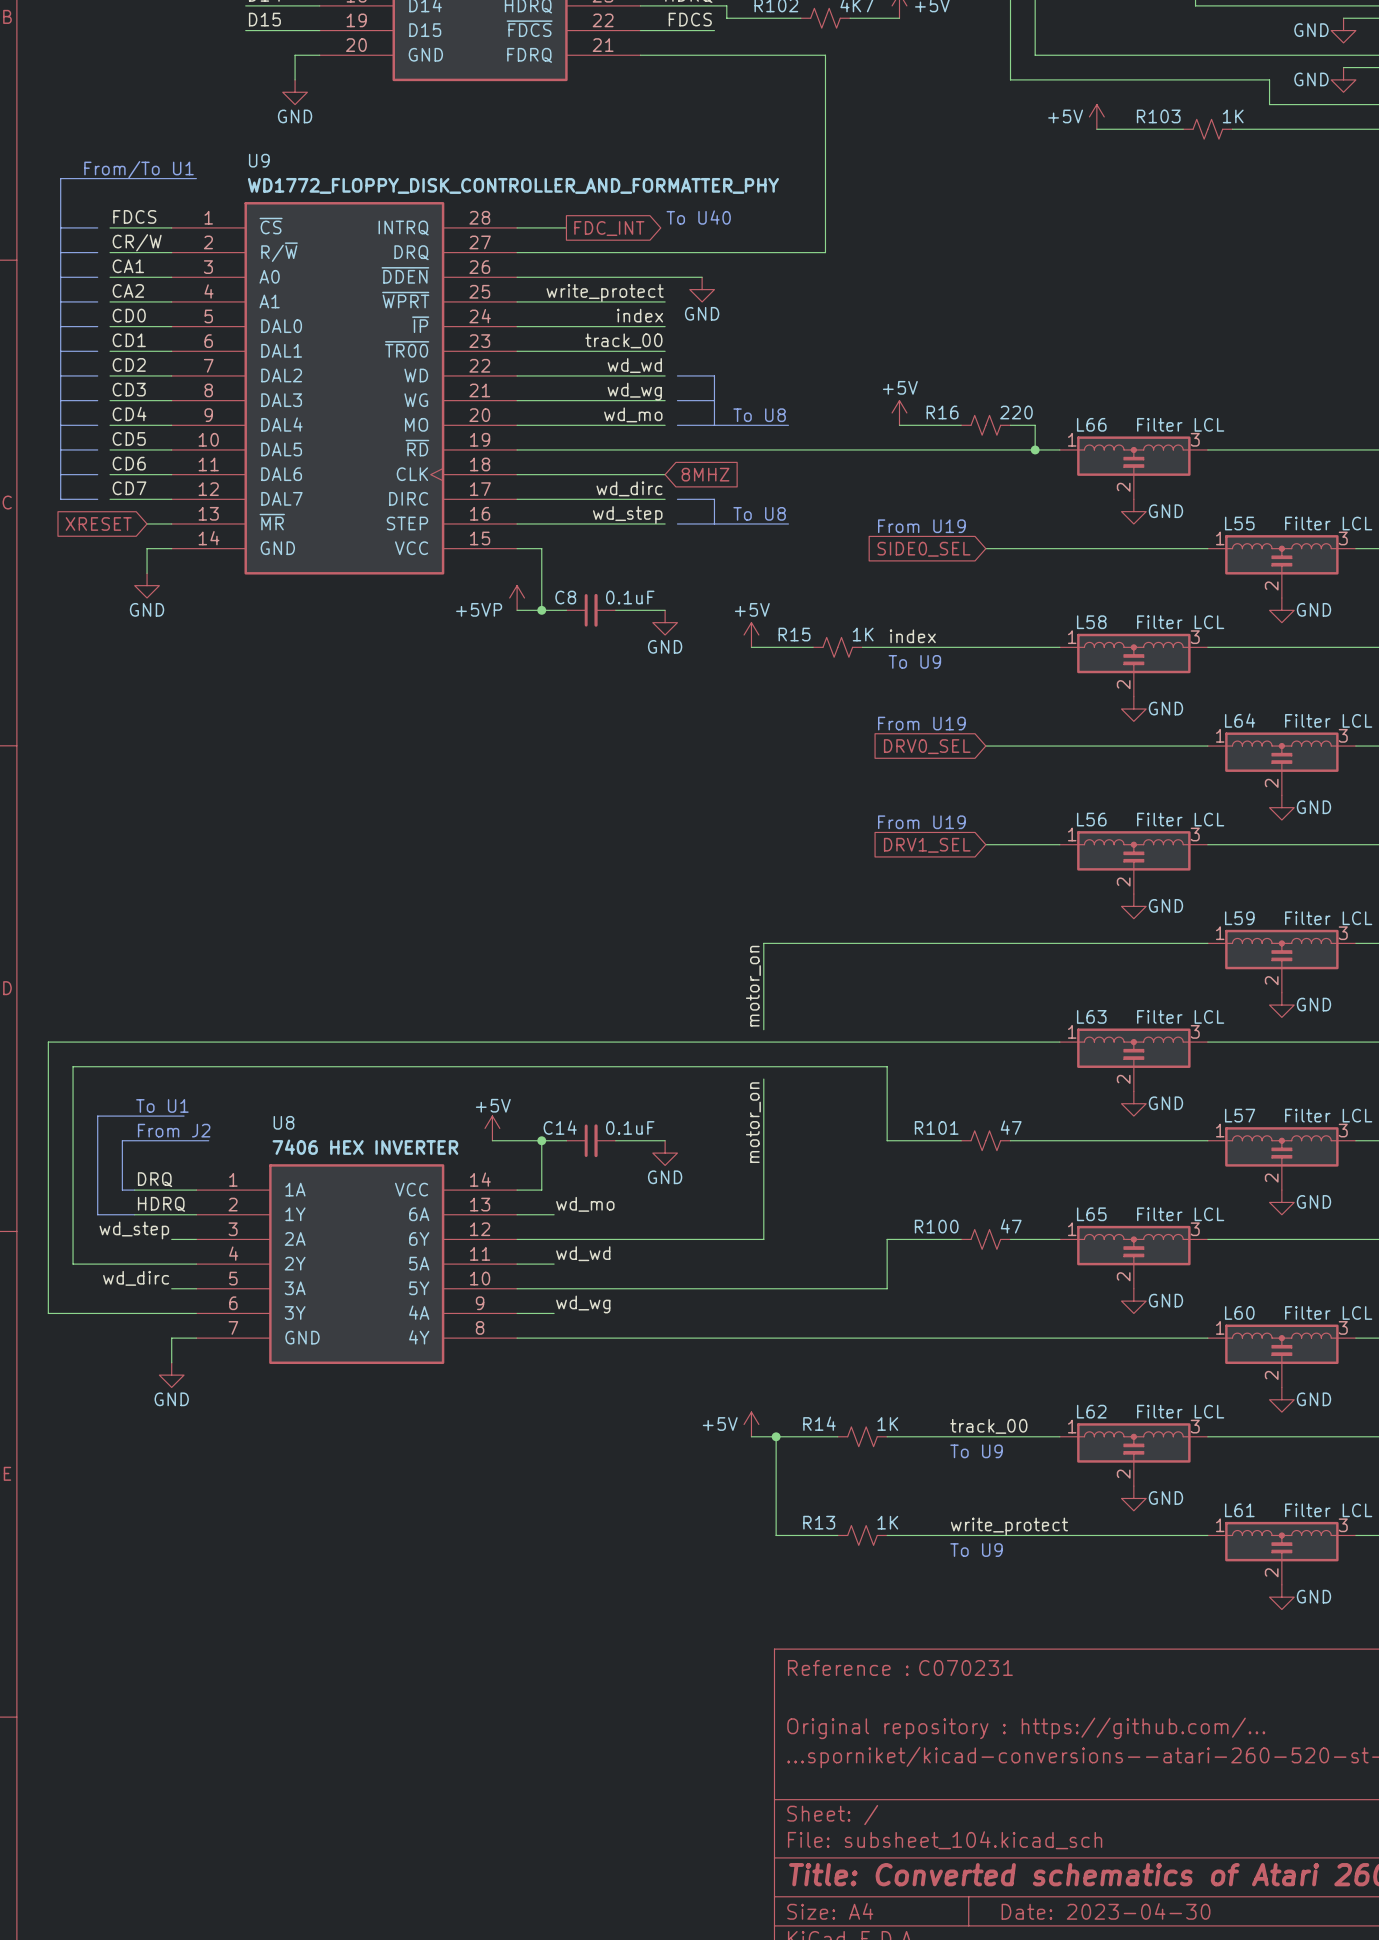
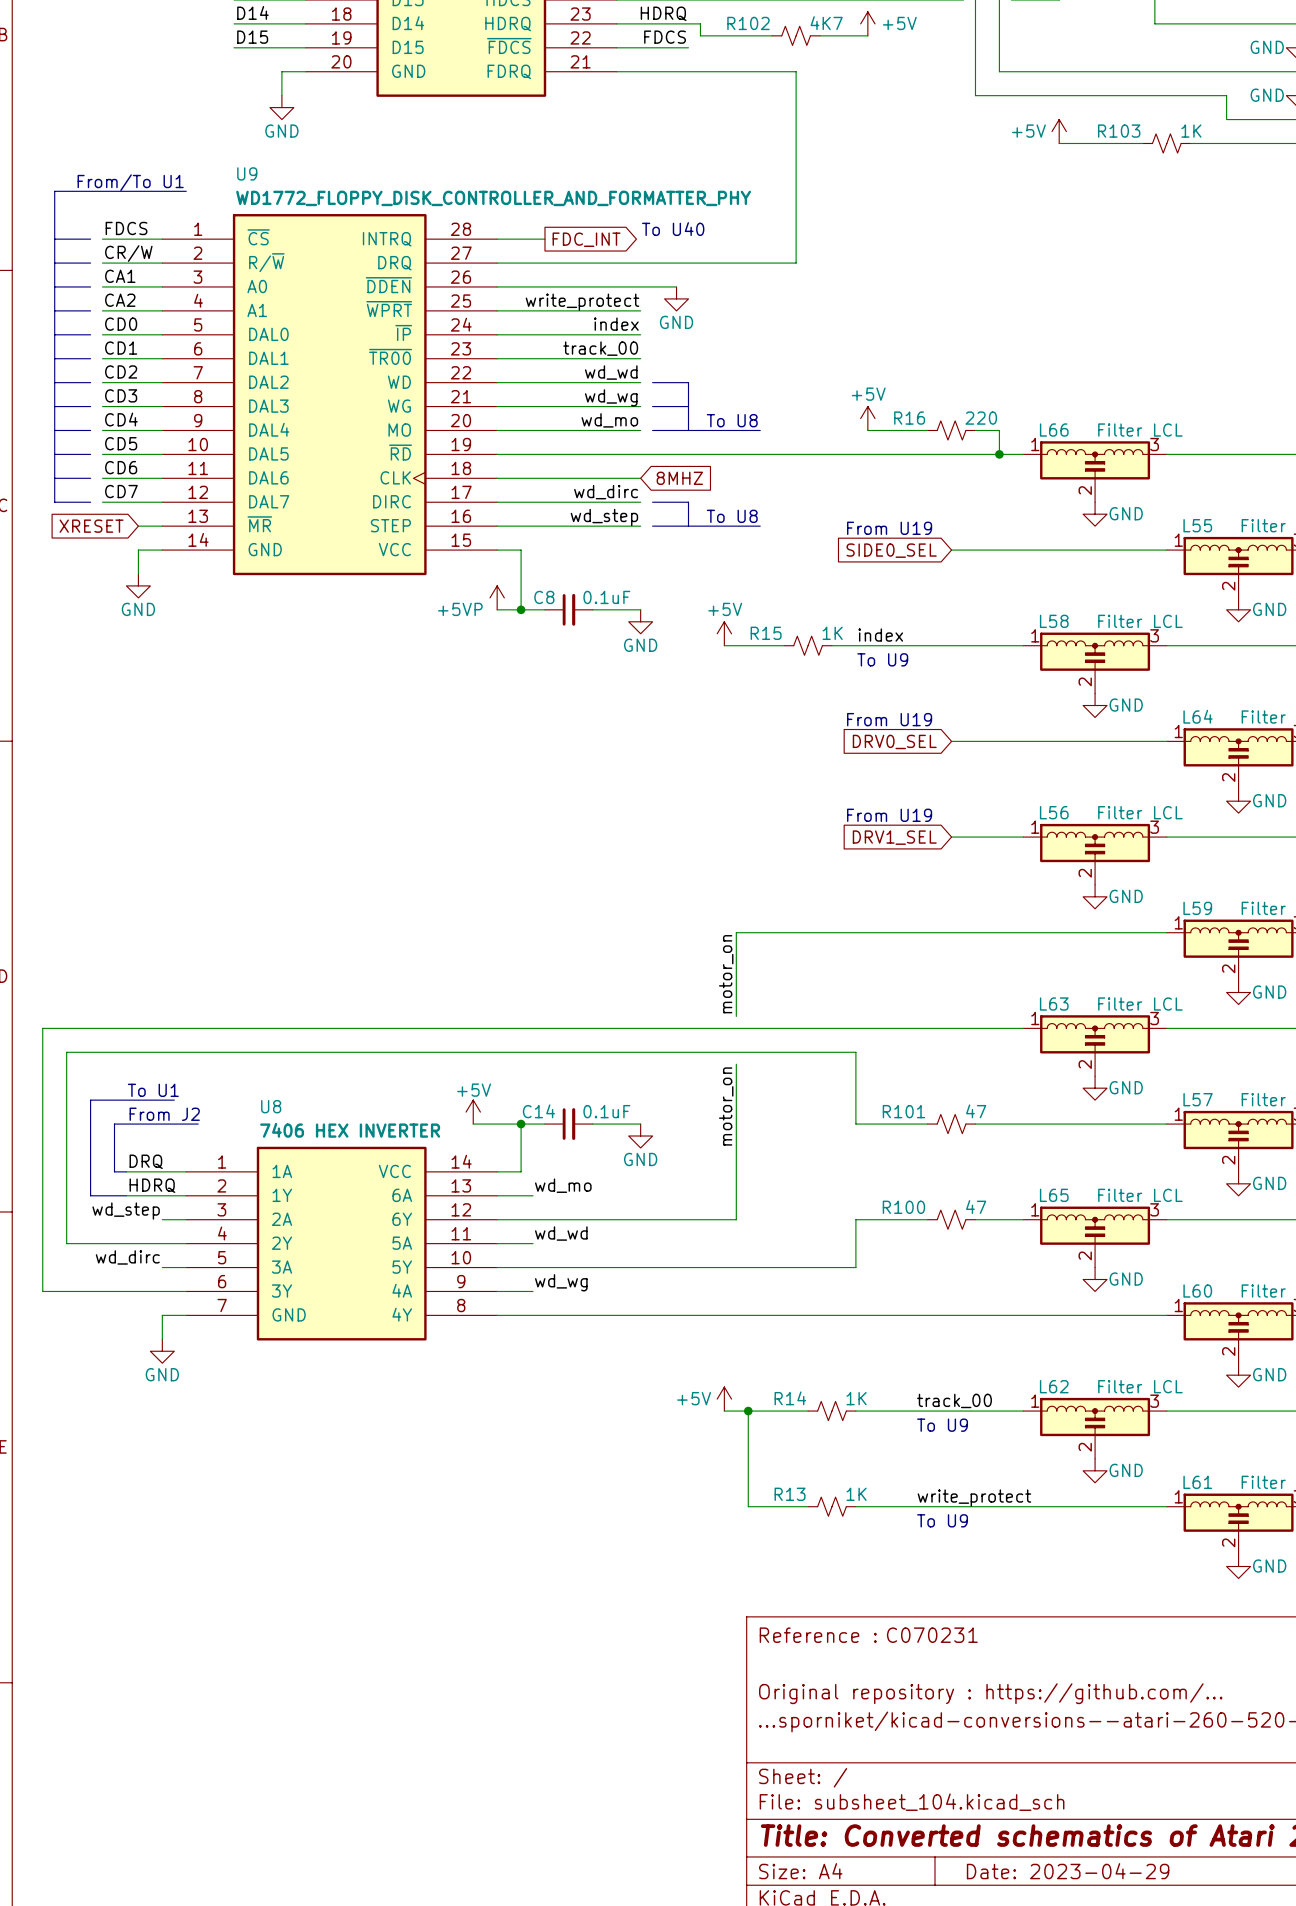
title block: Date: 2023-04-30 (1106, 1911) -> Date: 2023-04-29 (1068, 1871)

